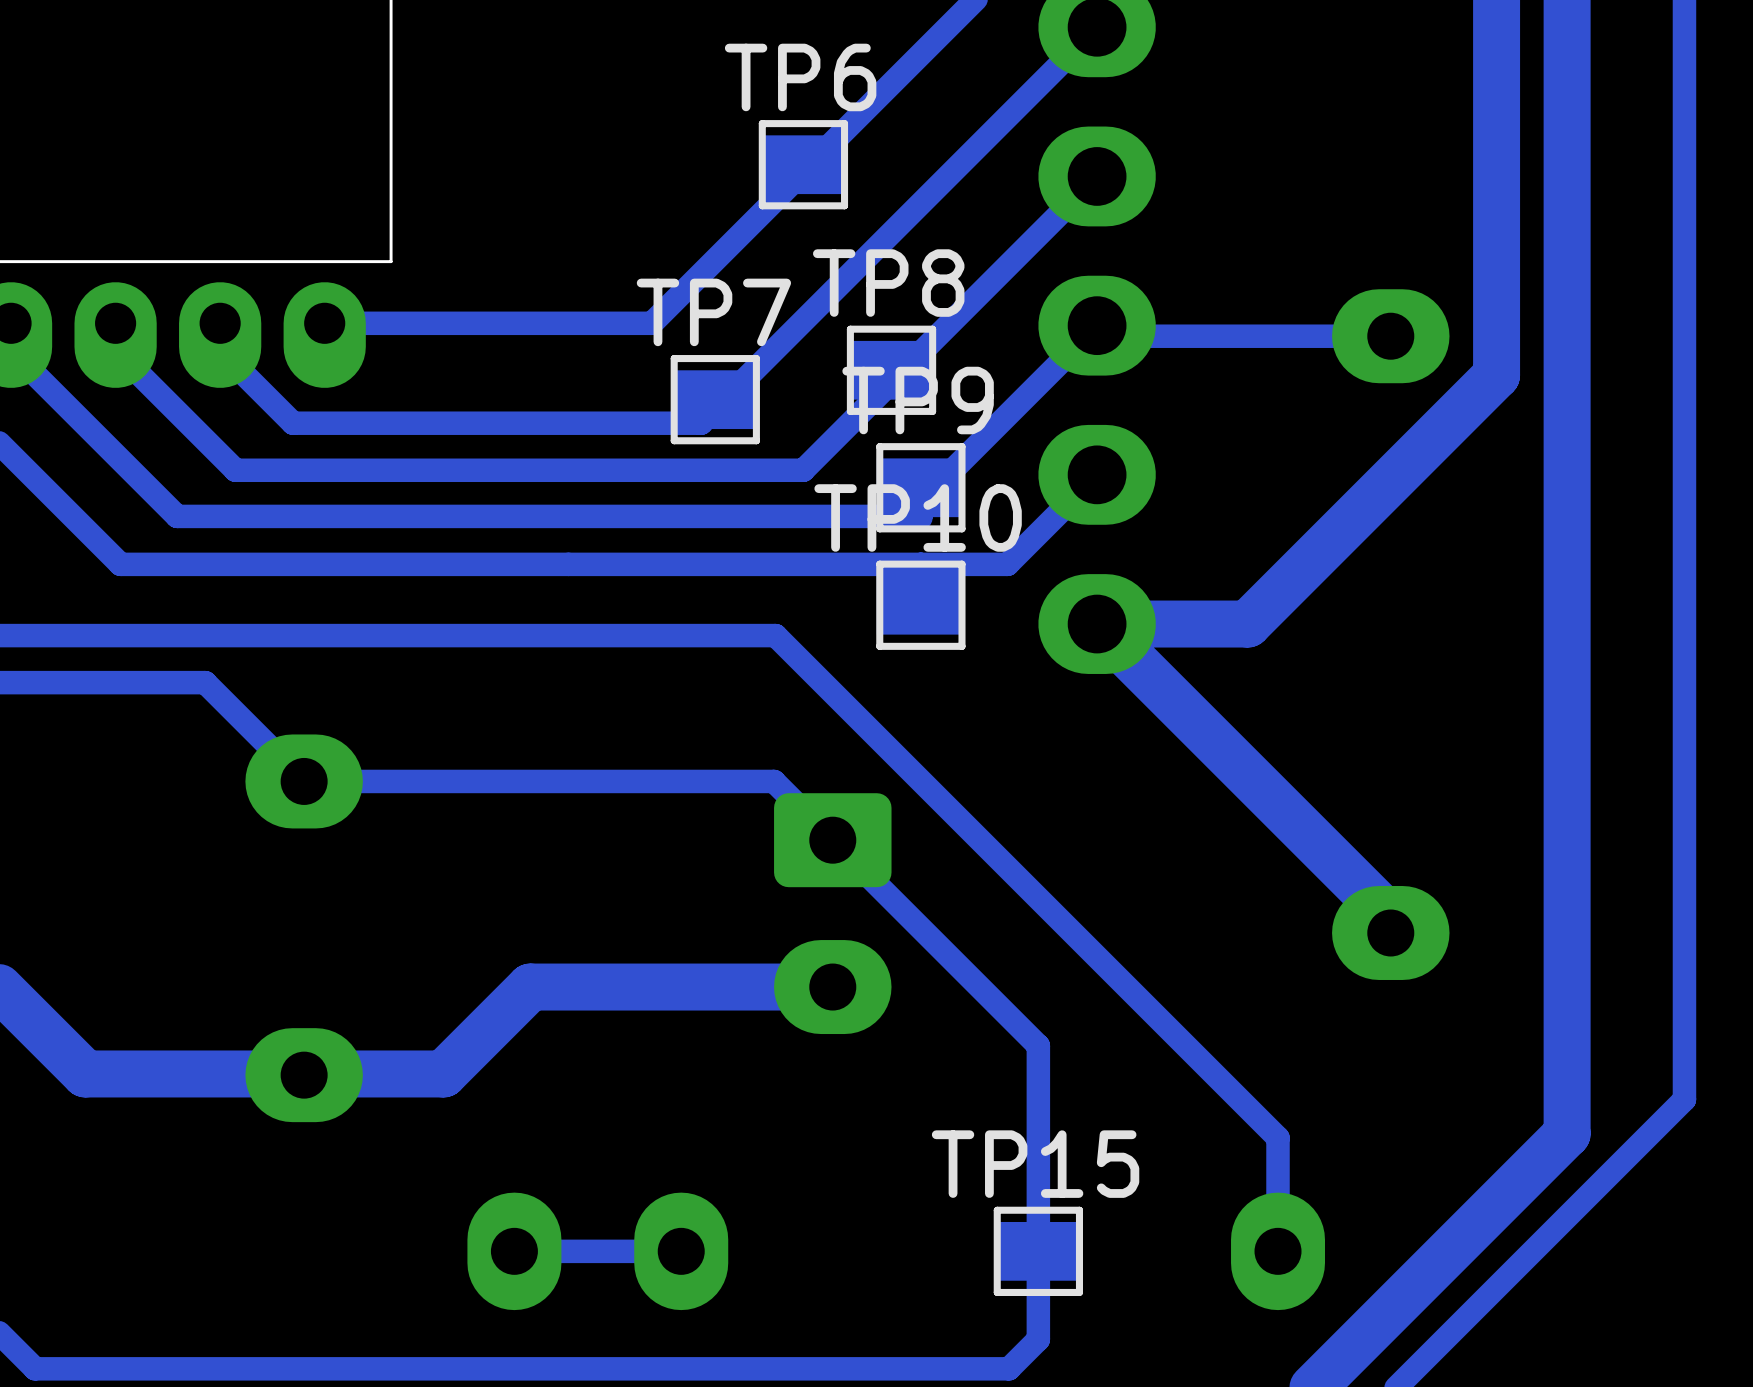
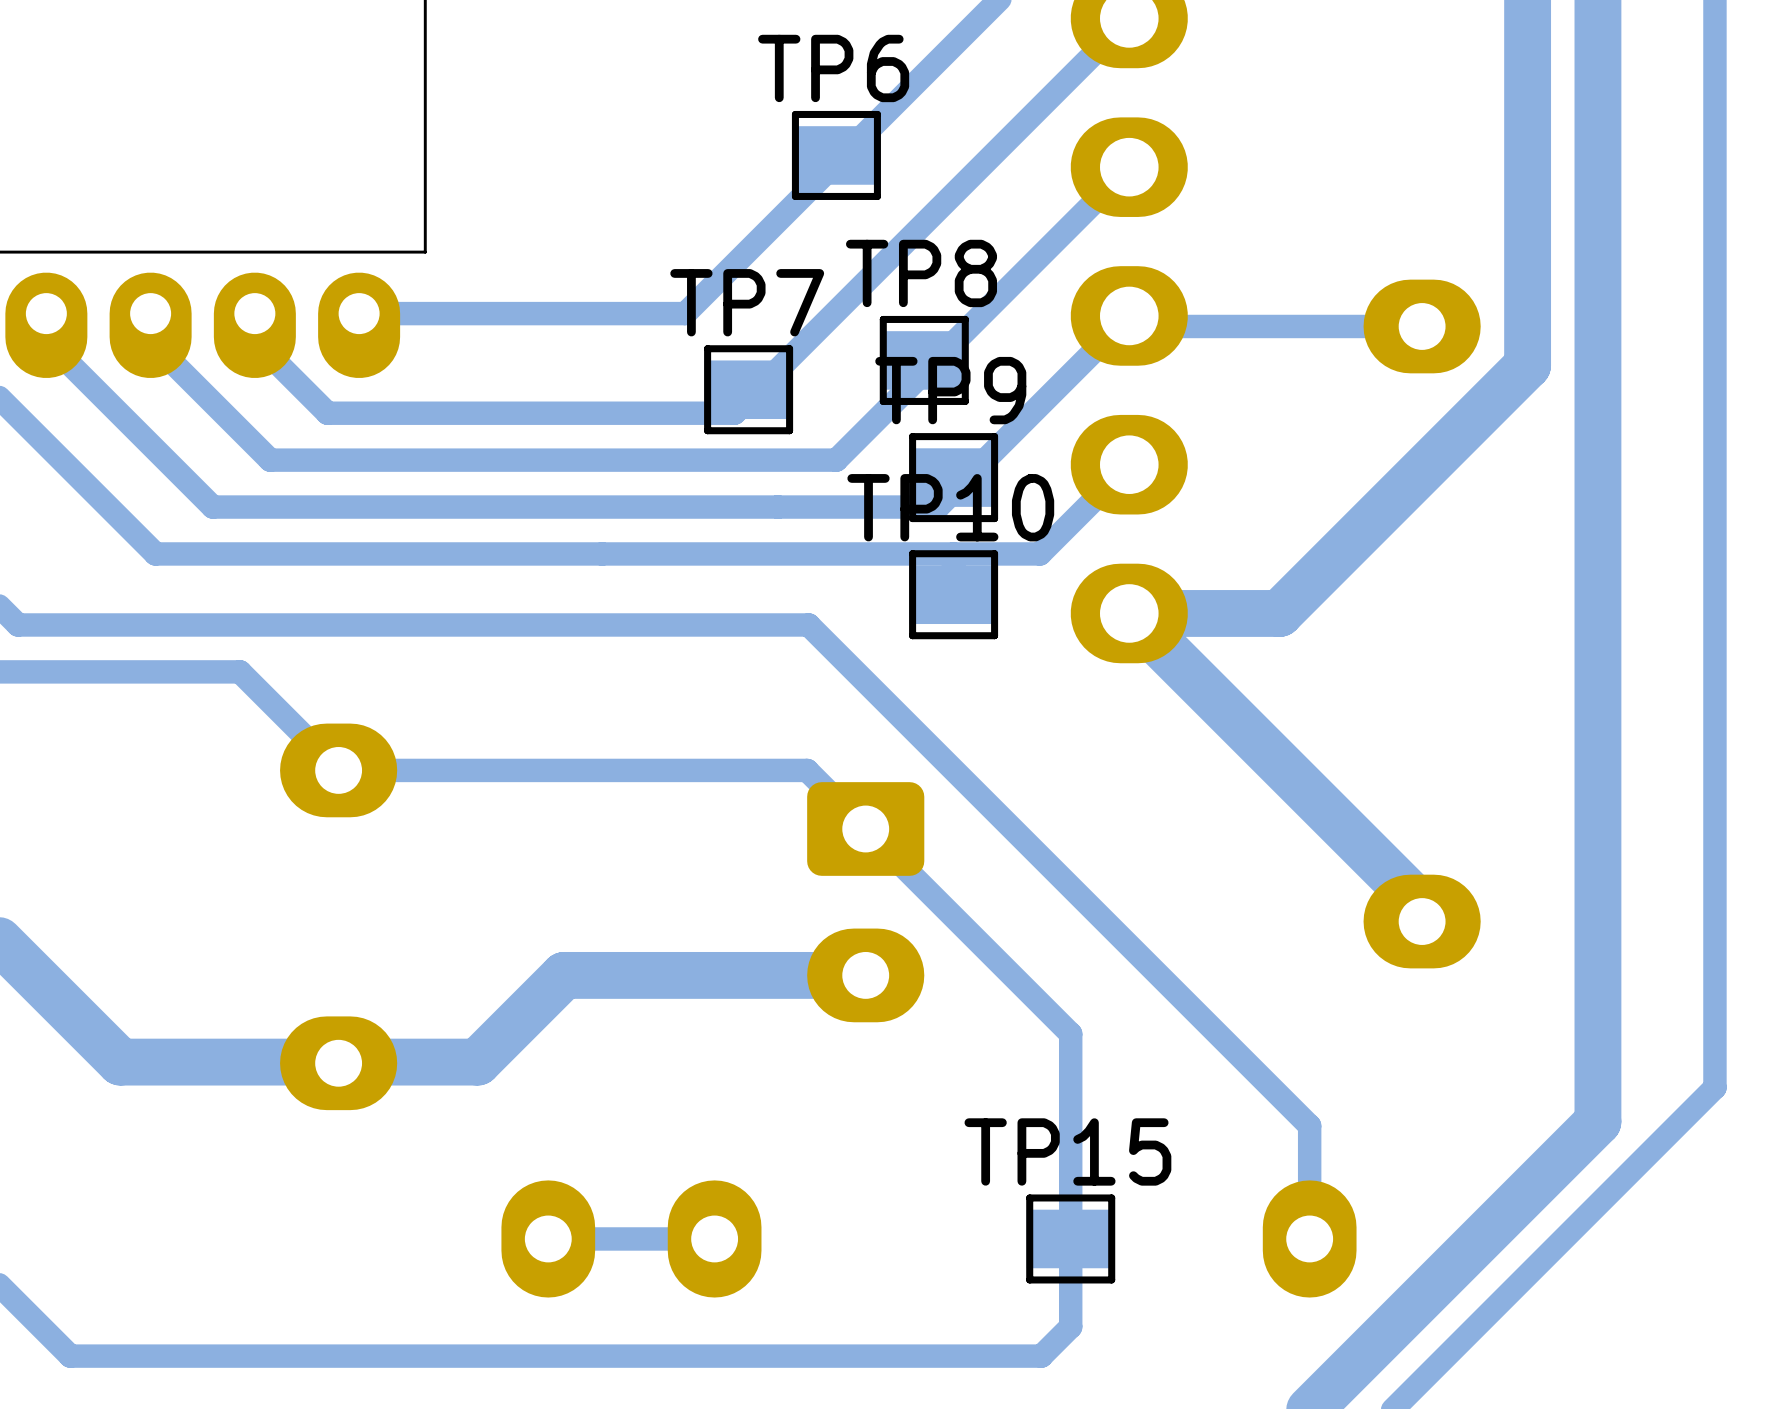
bottom track: (177, 516) (920, 517) -> (211, 506) (938, 507)

